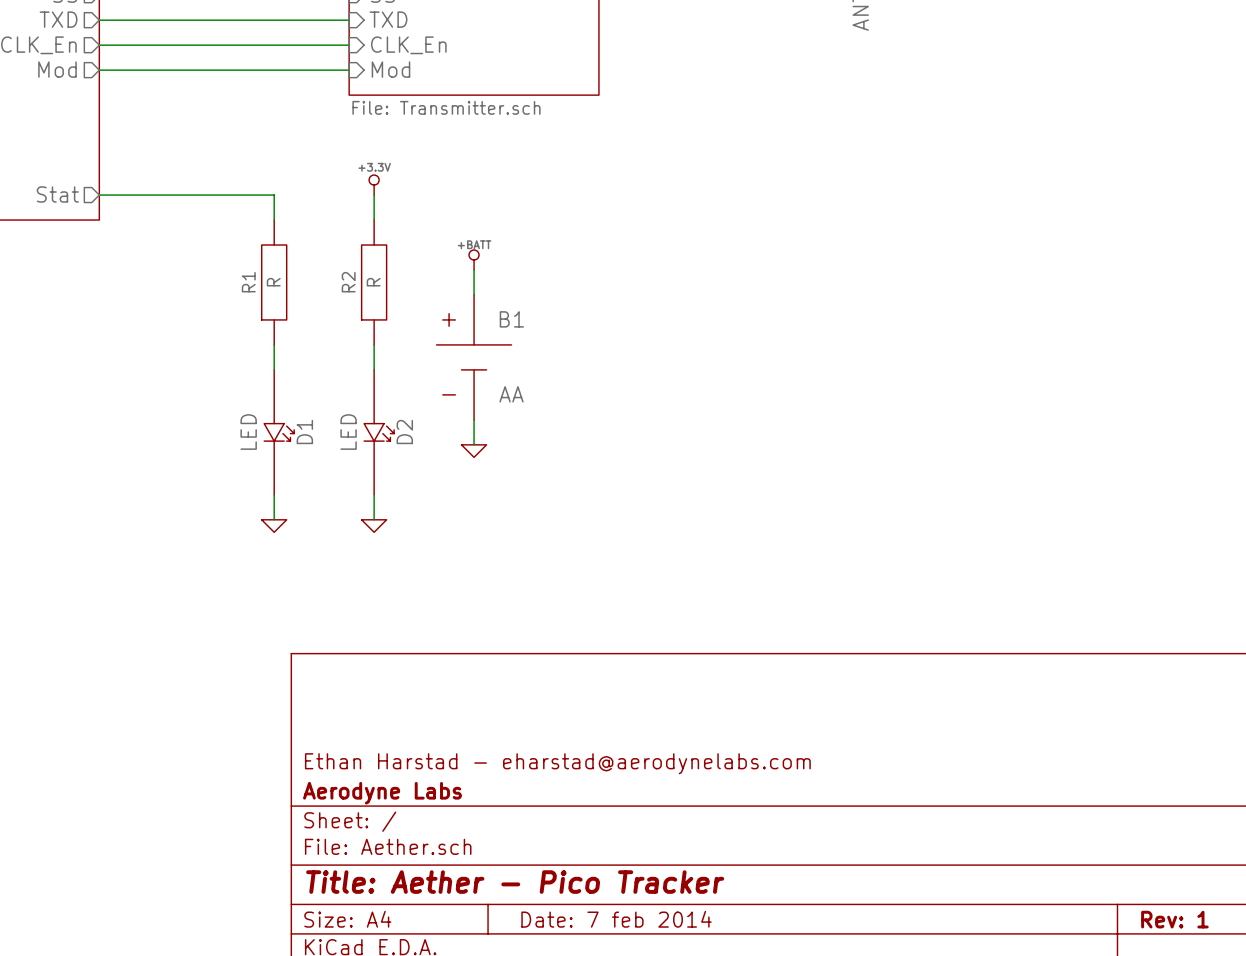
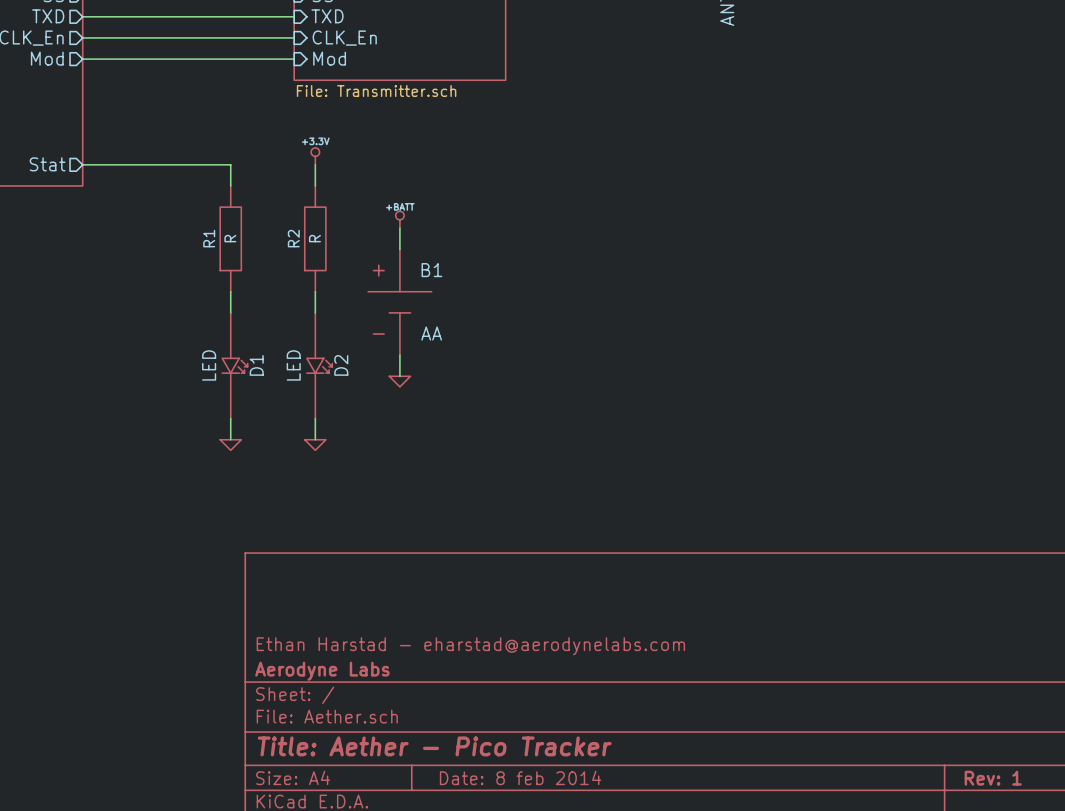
title block: Date: 7 feb 2014 (616, 919) -> Date: 8 feb 2014 (520, 777)

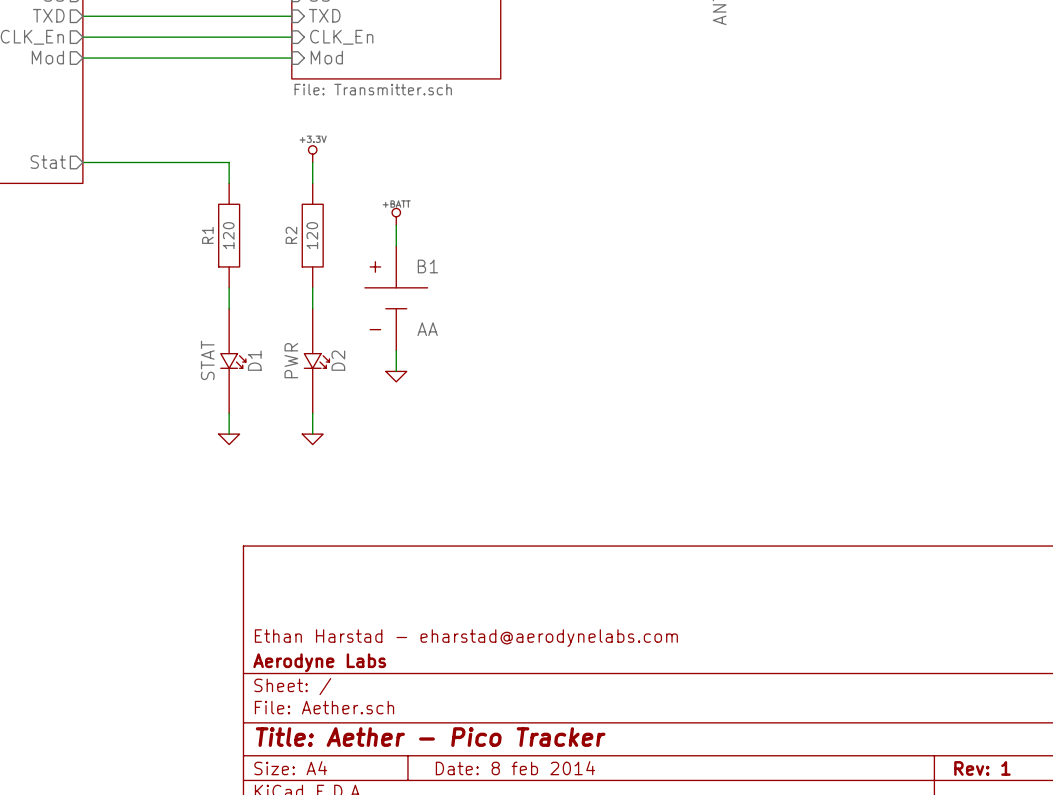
R1 value: R (230, 238) -> 120 (228, 235)
R2 value: R (314, 238) -> 120 (312, 235)
D1 value: LED (209, 365) -> STAT (207, 360)
D2 value: LED (293, 365) -> PWR (291, 360)

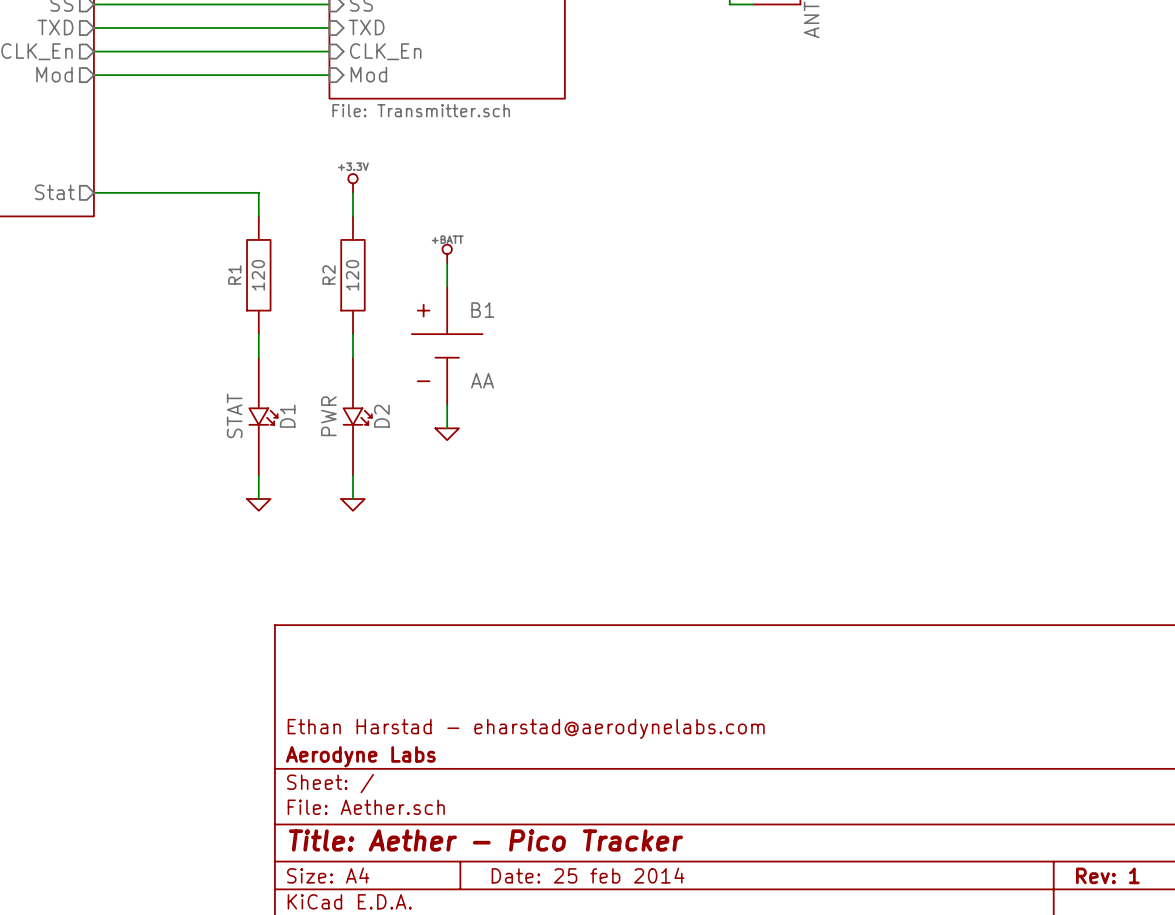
title block: Date: 8 feb 2014 (515, 768) -> Date: 25 feb 2014 (588, 875)

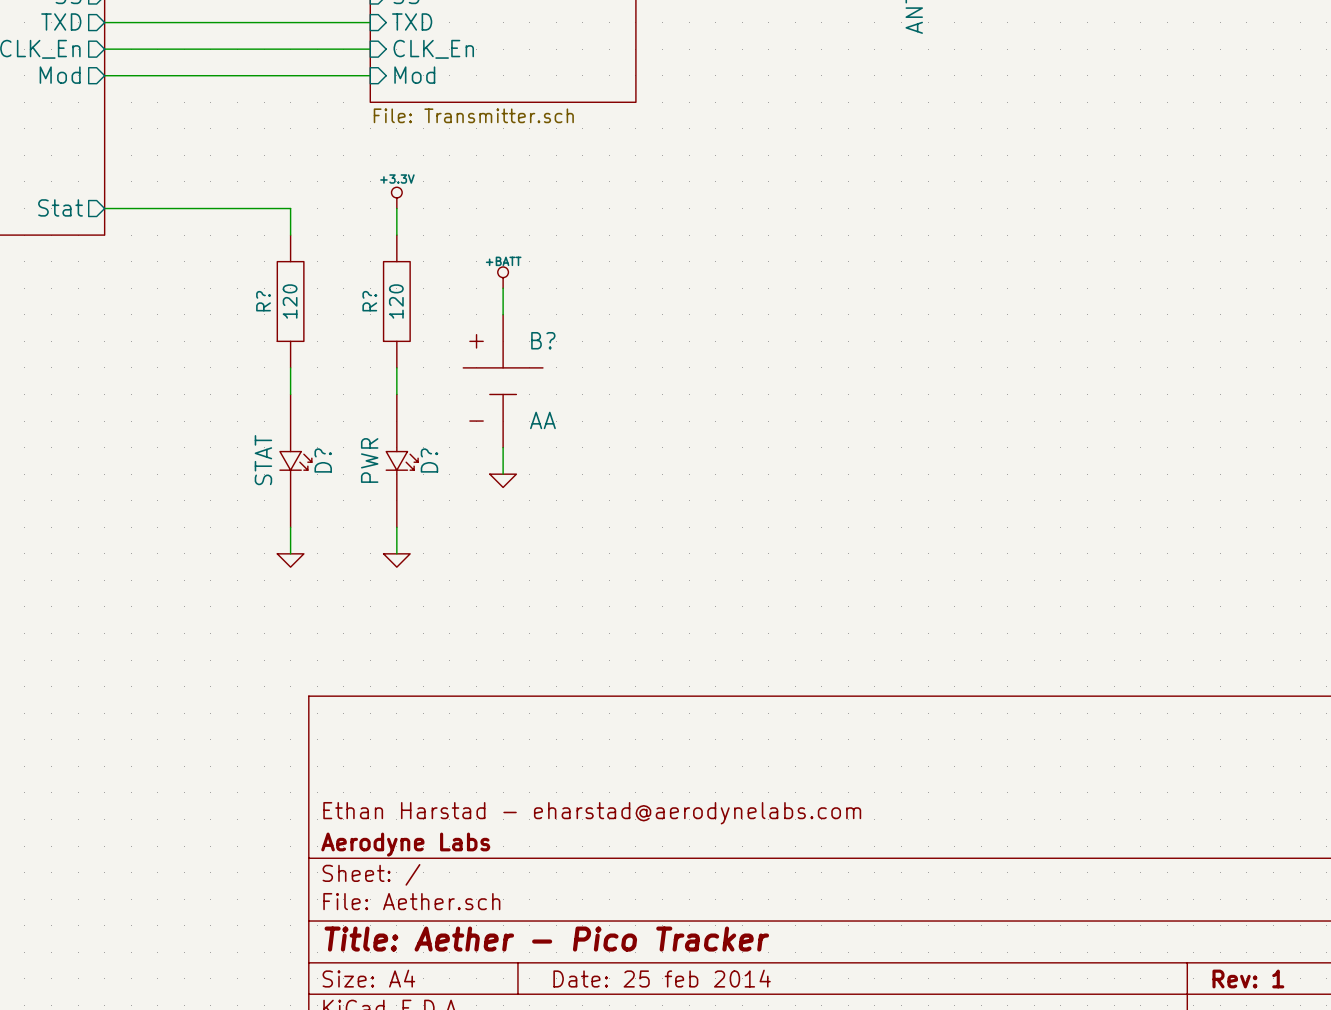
R1 name: R1 (234, 275) -> R? (263, 301)
R2 name: R2 (329, 275) -> R? (369, 301)
B1 name: B1 (482, 310) -> B? (543, 340)
D1 name: D1 (287, 416) -> D? (323, 460)
D2 name: D2 (381, 416) -> D? (429, 460)

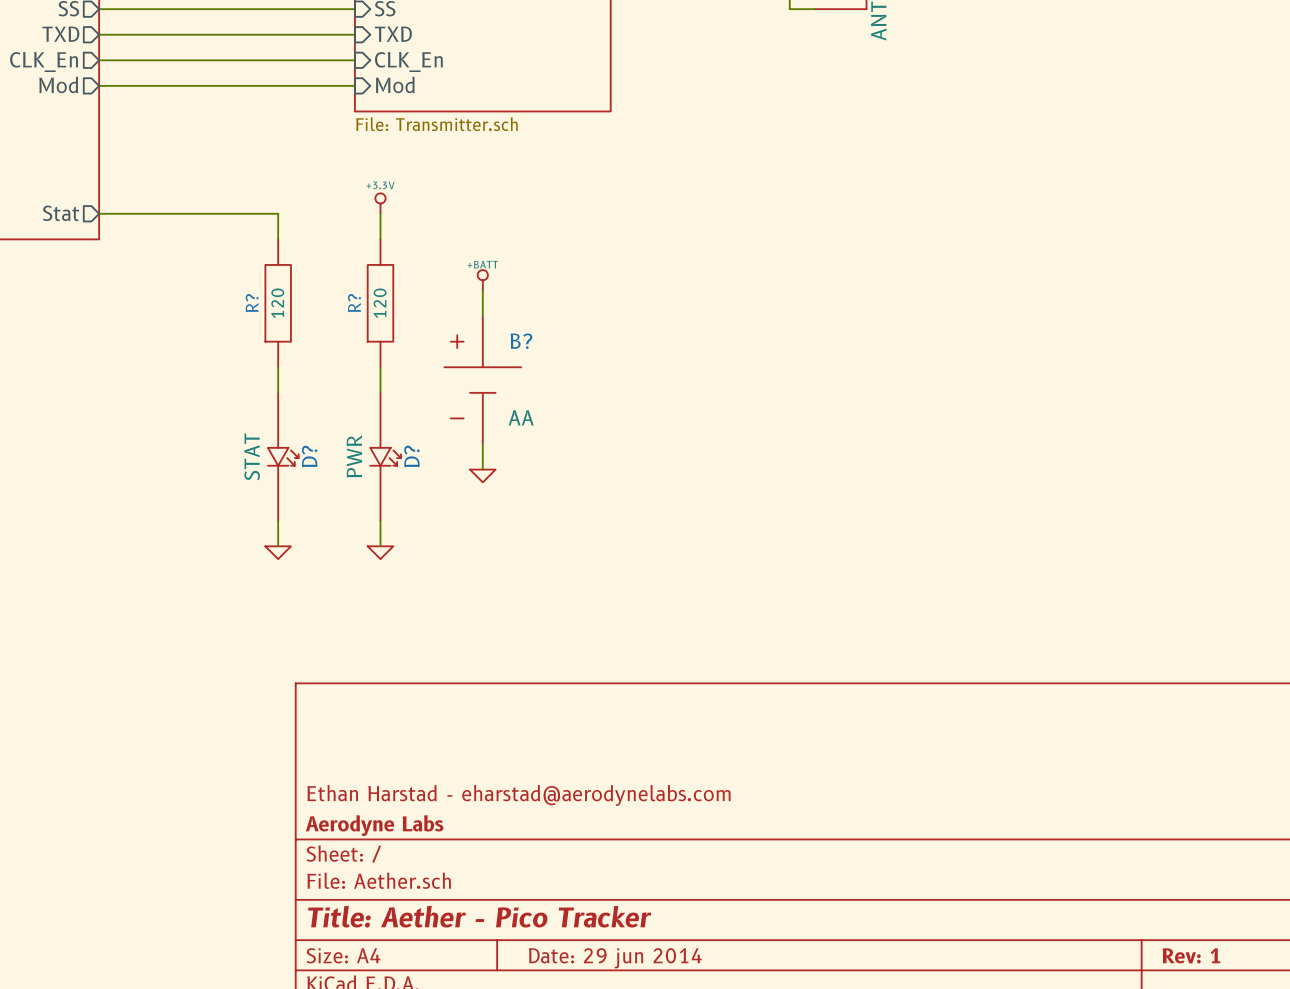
title block: Date: 25 feb 2014 (662, 978) -> Date: 29 jun 2014 (615, 958)

